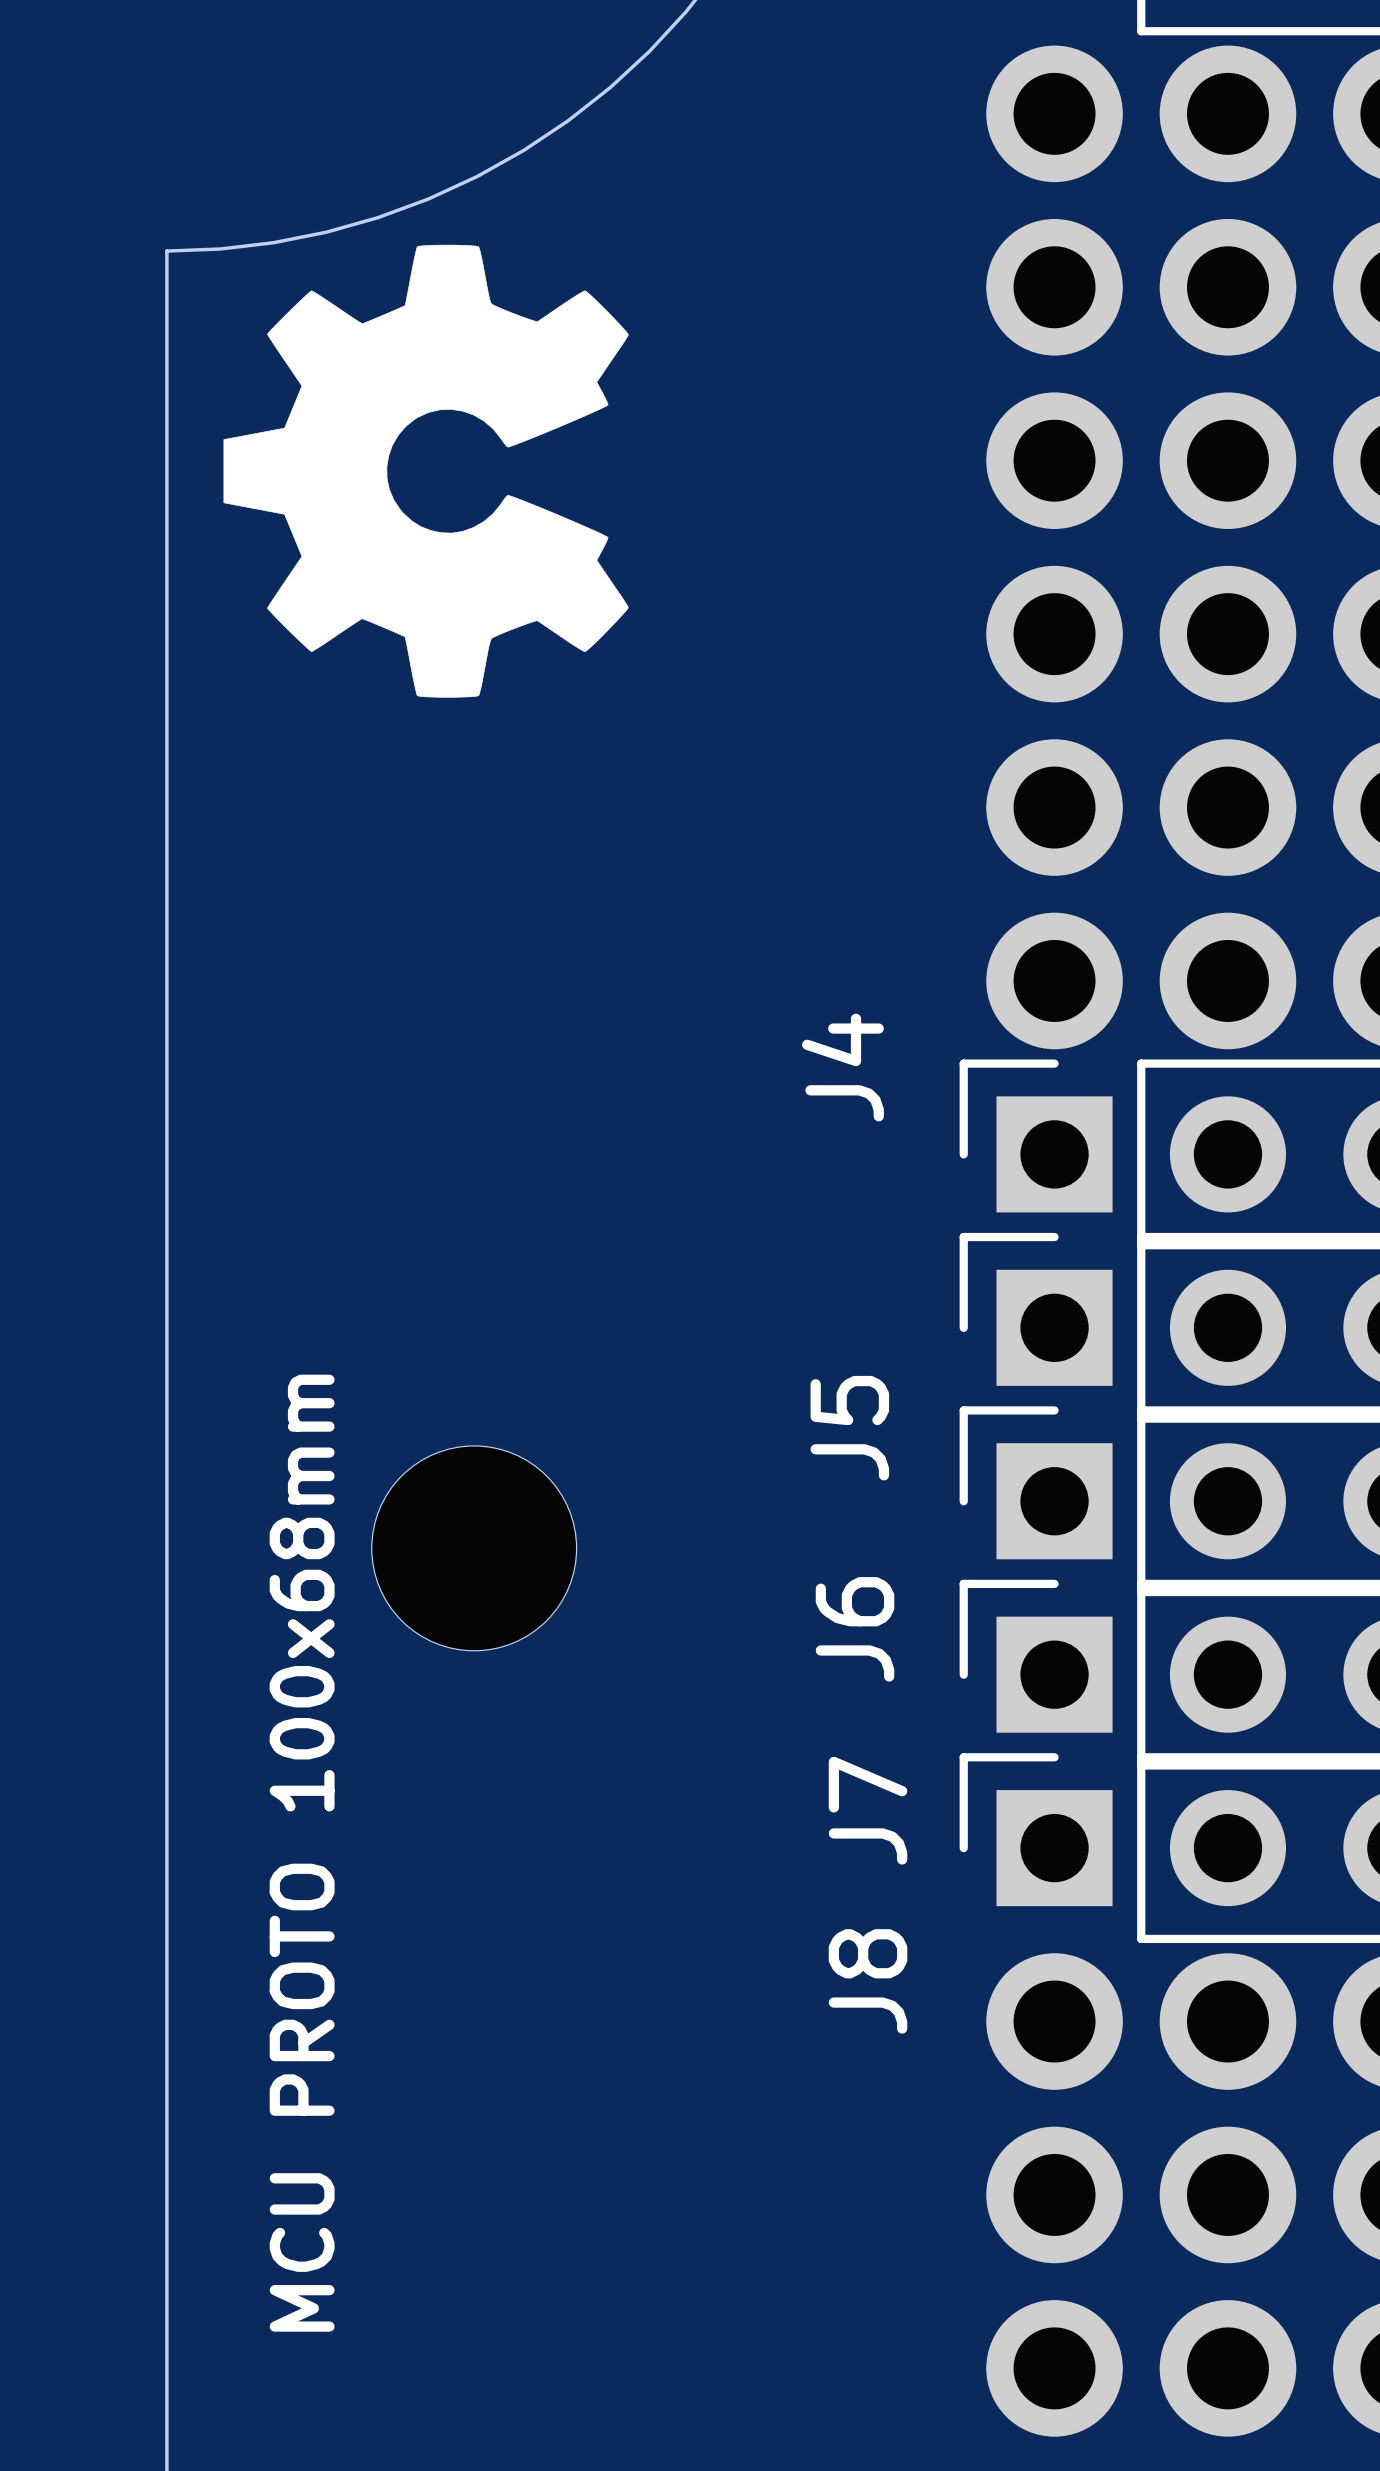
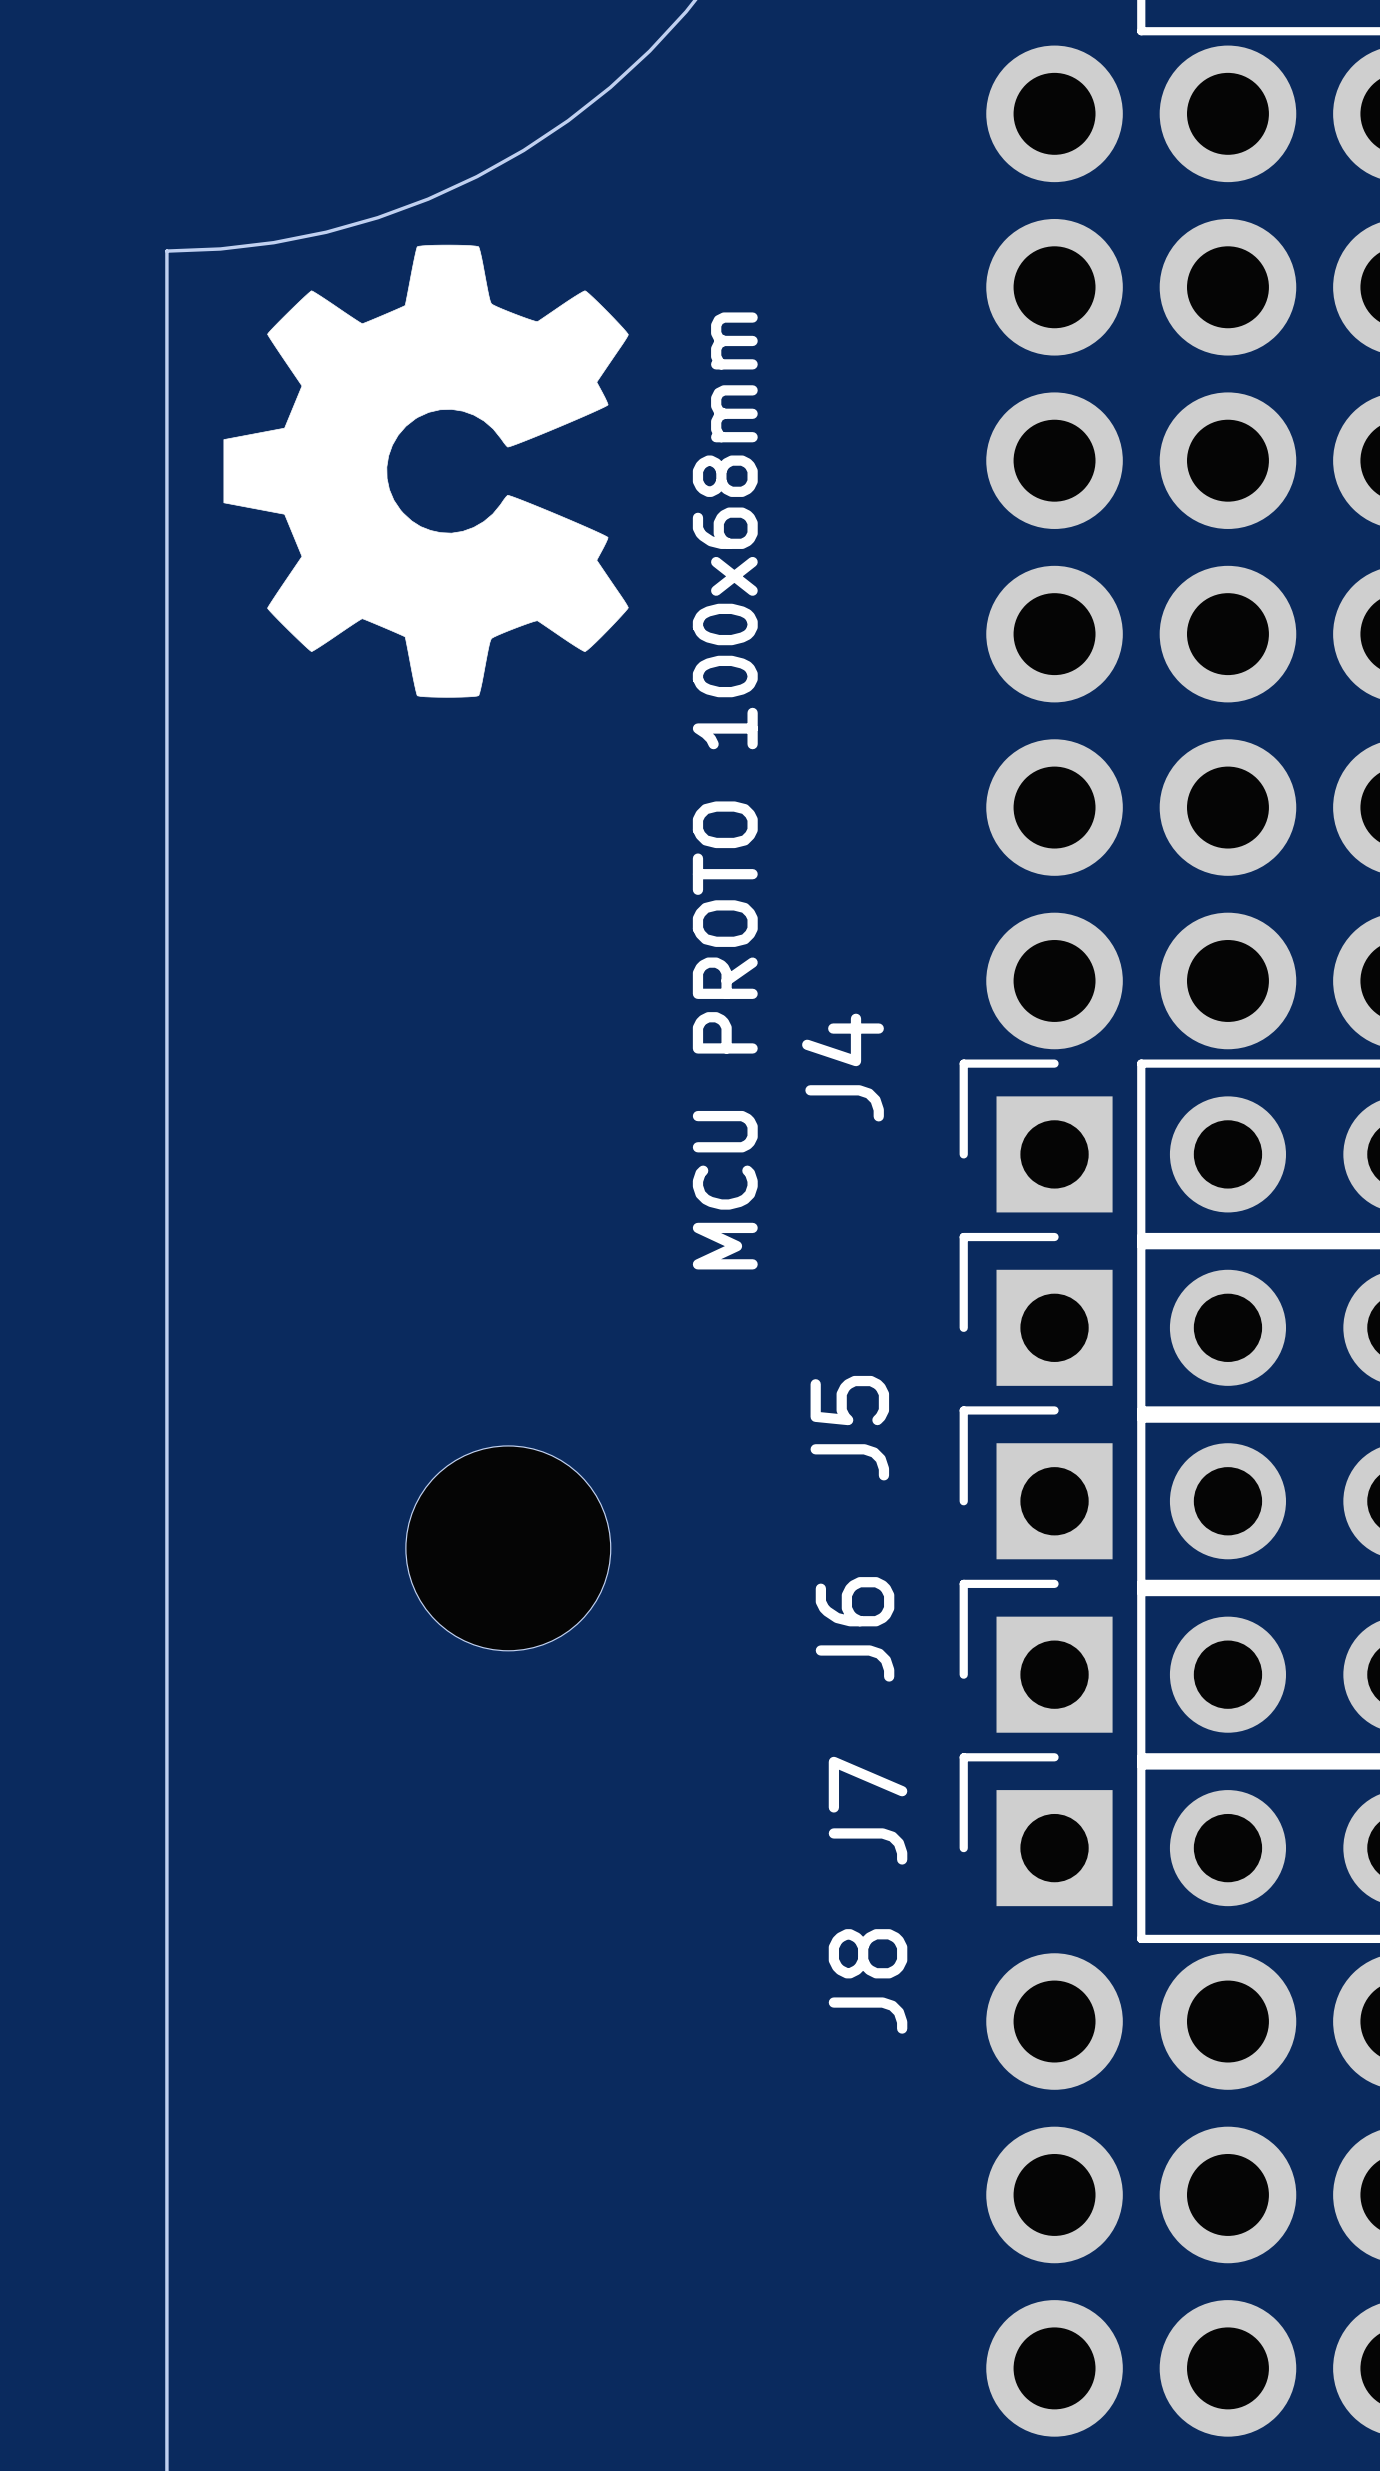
part position: (474, 1548) -> (508, 1548)
text position: MCU PROTO 100x68mm (302, 1853) -> MCU PROTO 100x68mm (725, 790)

